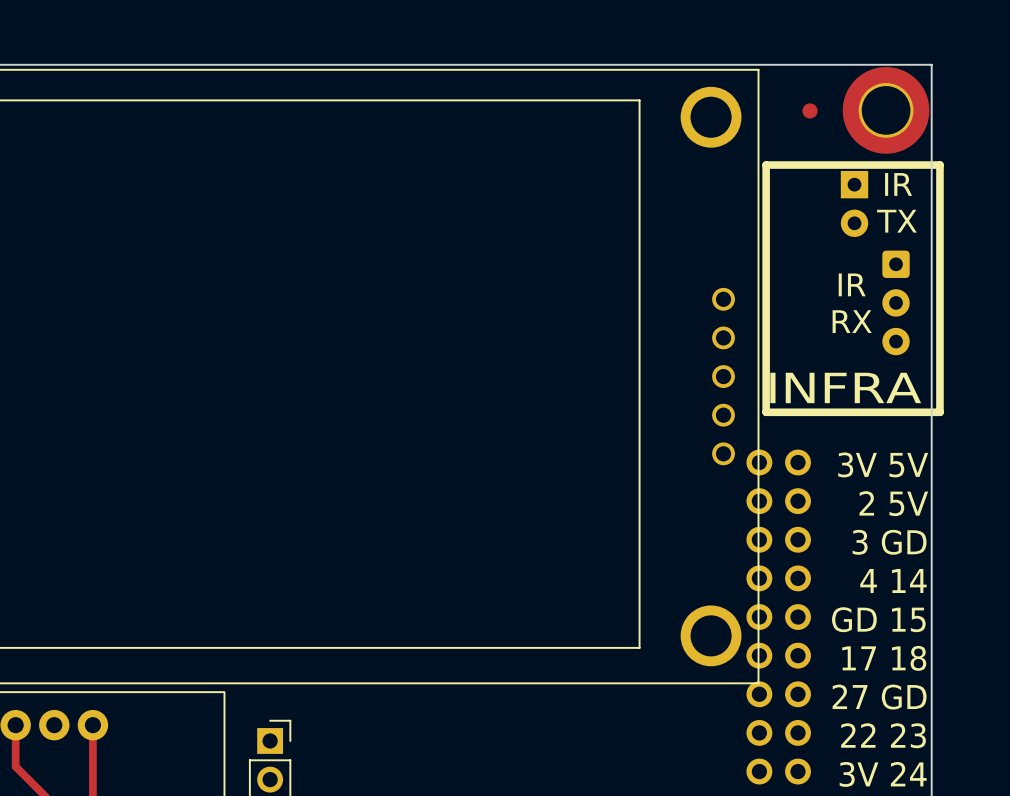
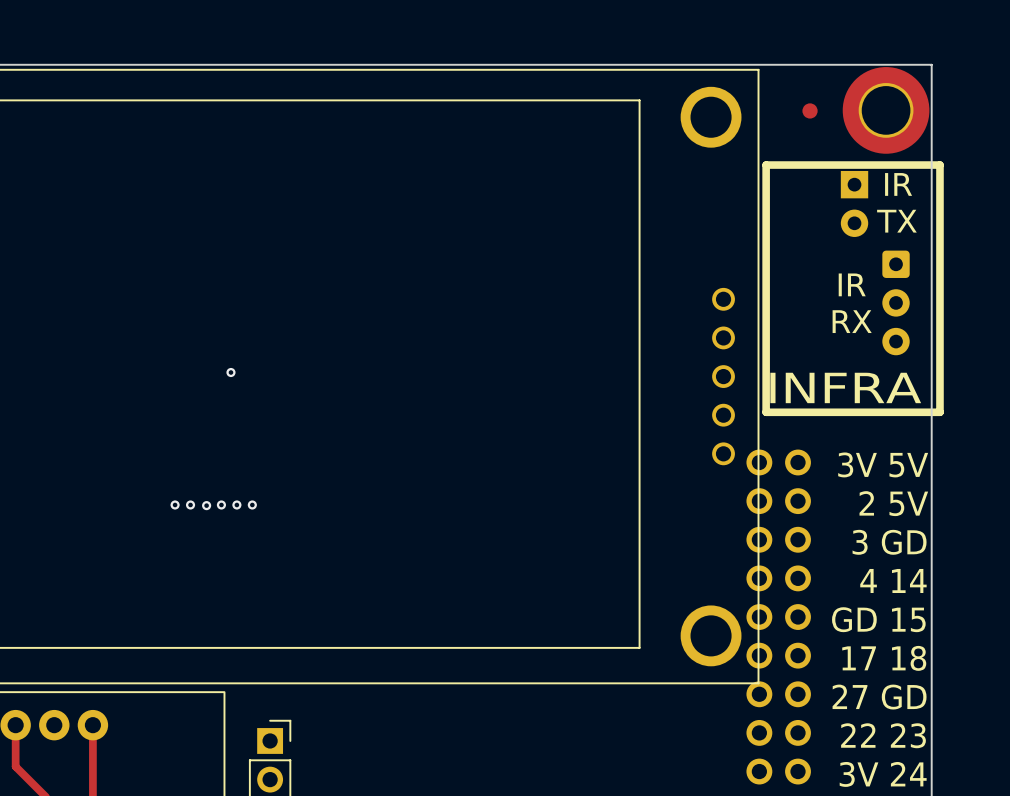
via: none -> (230, 372)
via: none -> (175, 504)
via: none -> (190, 504)
via: none -> (221, 504)
via: none -> (236, 504)
via: none -> (252, 504)
via: none -> (206, 505)

